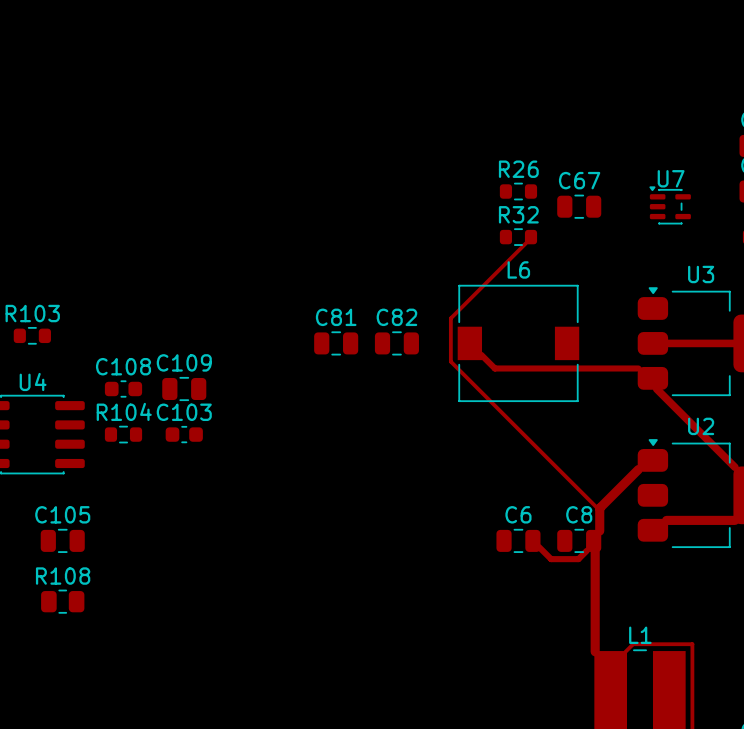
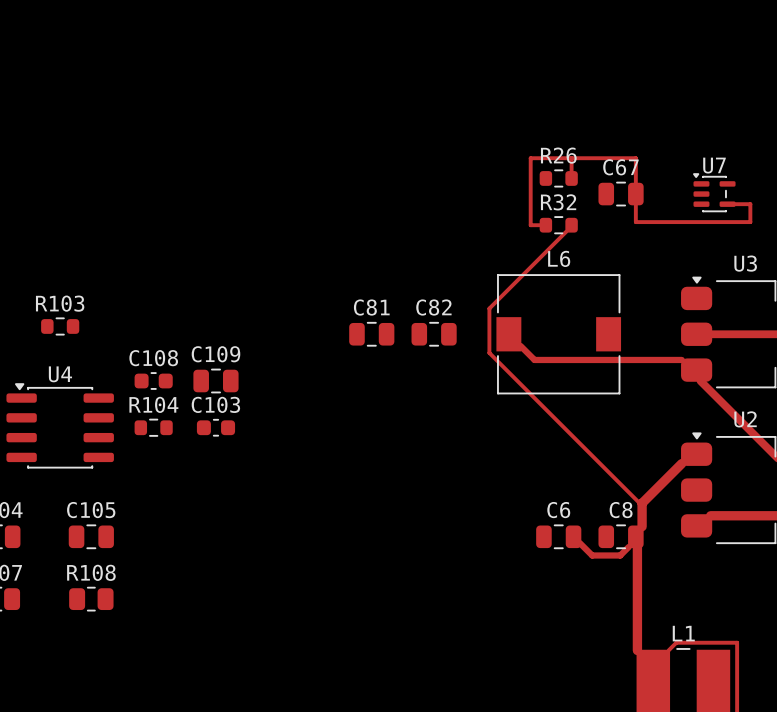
top track: none -> (571, 158) (571, 178)
top track: none -> (727, 204) (750, 204) (750, 222) (635, 222) (635, 158) (530, 158) (530, 225) (545, 225)

